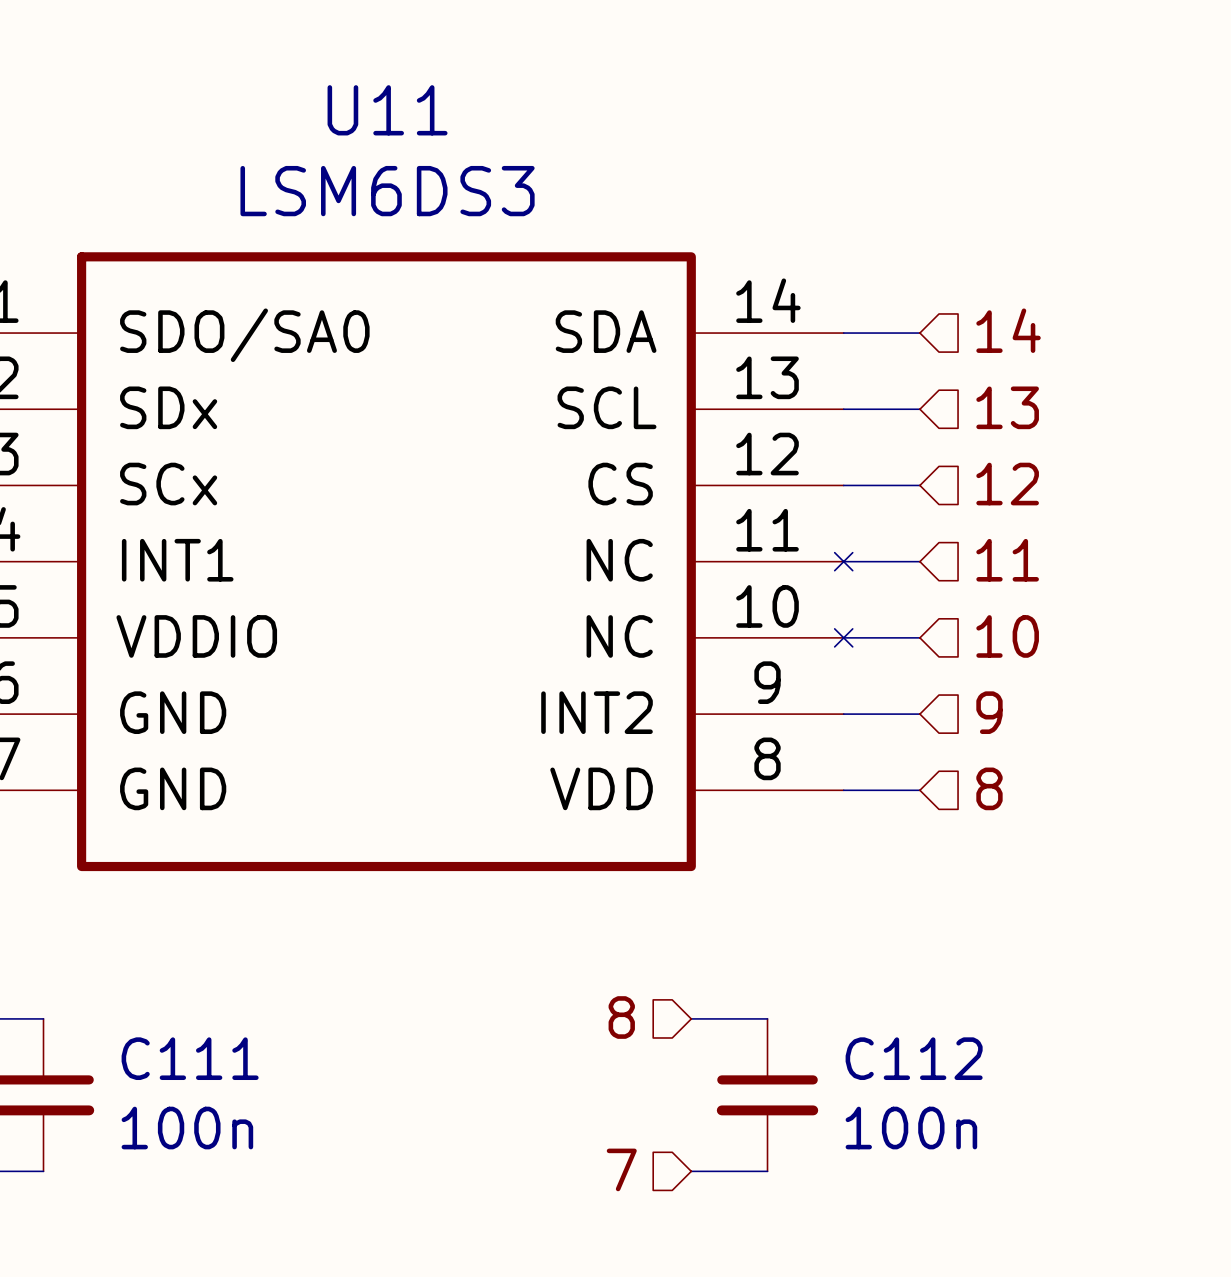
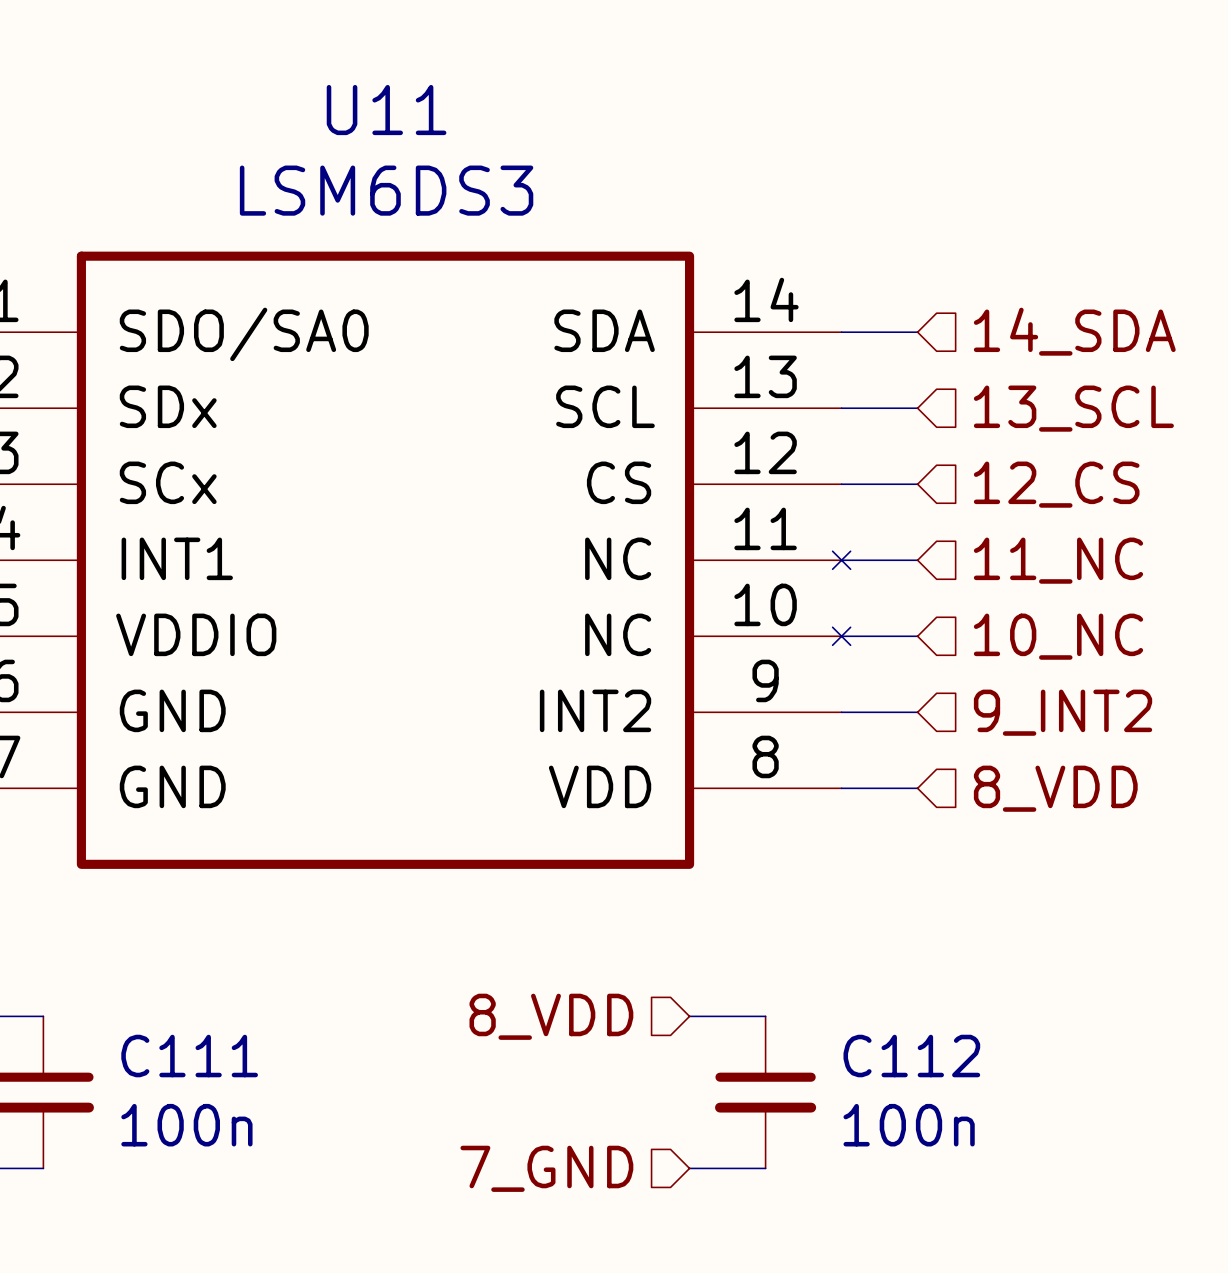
hierarchical label: 14 (1008, 330) -> 14_SDA (1074, 331)
hierarchical label: 13 (1007, 407) -> 13_SCL (1073, 408)
hierarchical label: 12 (1007, 484) -> 12_CS (1056, 484)
hierarchical label: 11 (1007, 560) -> 11_NC (1058, 560)
hierarchical label: 10 (1007, 636) -> 10_NC (1058, 636)
hierarchical label: 9 (989, 712) -> 9_INT2 (1063, 712)
hierarchical label: 8 (989, 788) -> 8_VDD (1055, 788)
hierarchical label: 8 (621, 1017) -> 8_VDD (551, 1016)
hierarchical label: 7 (621, 1169) -> 7_GND (546, 1168)

